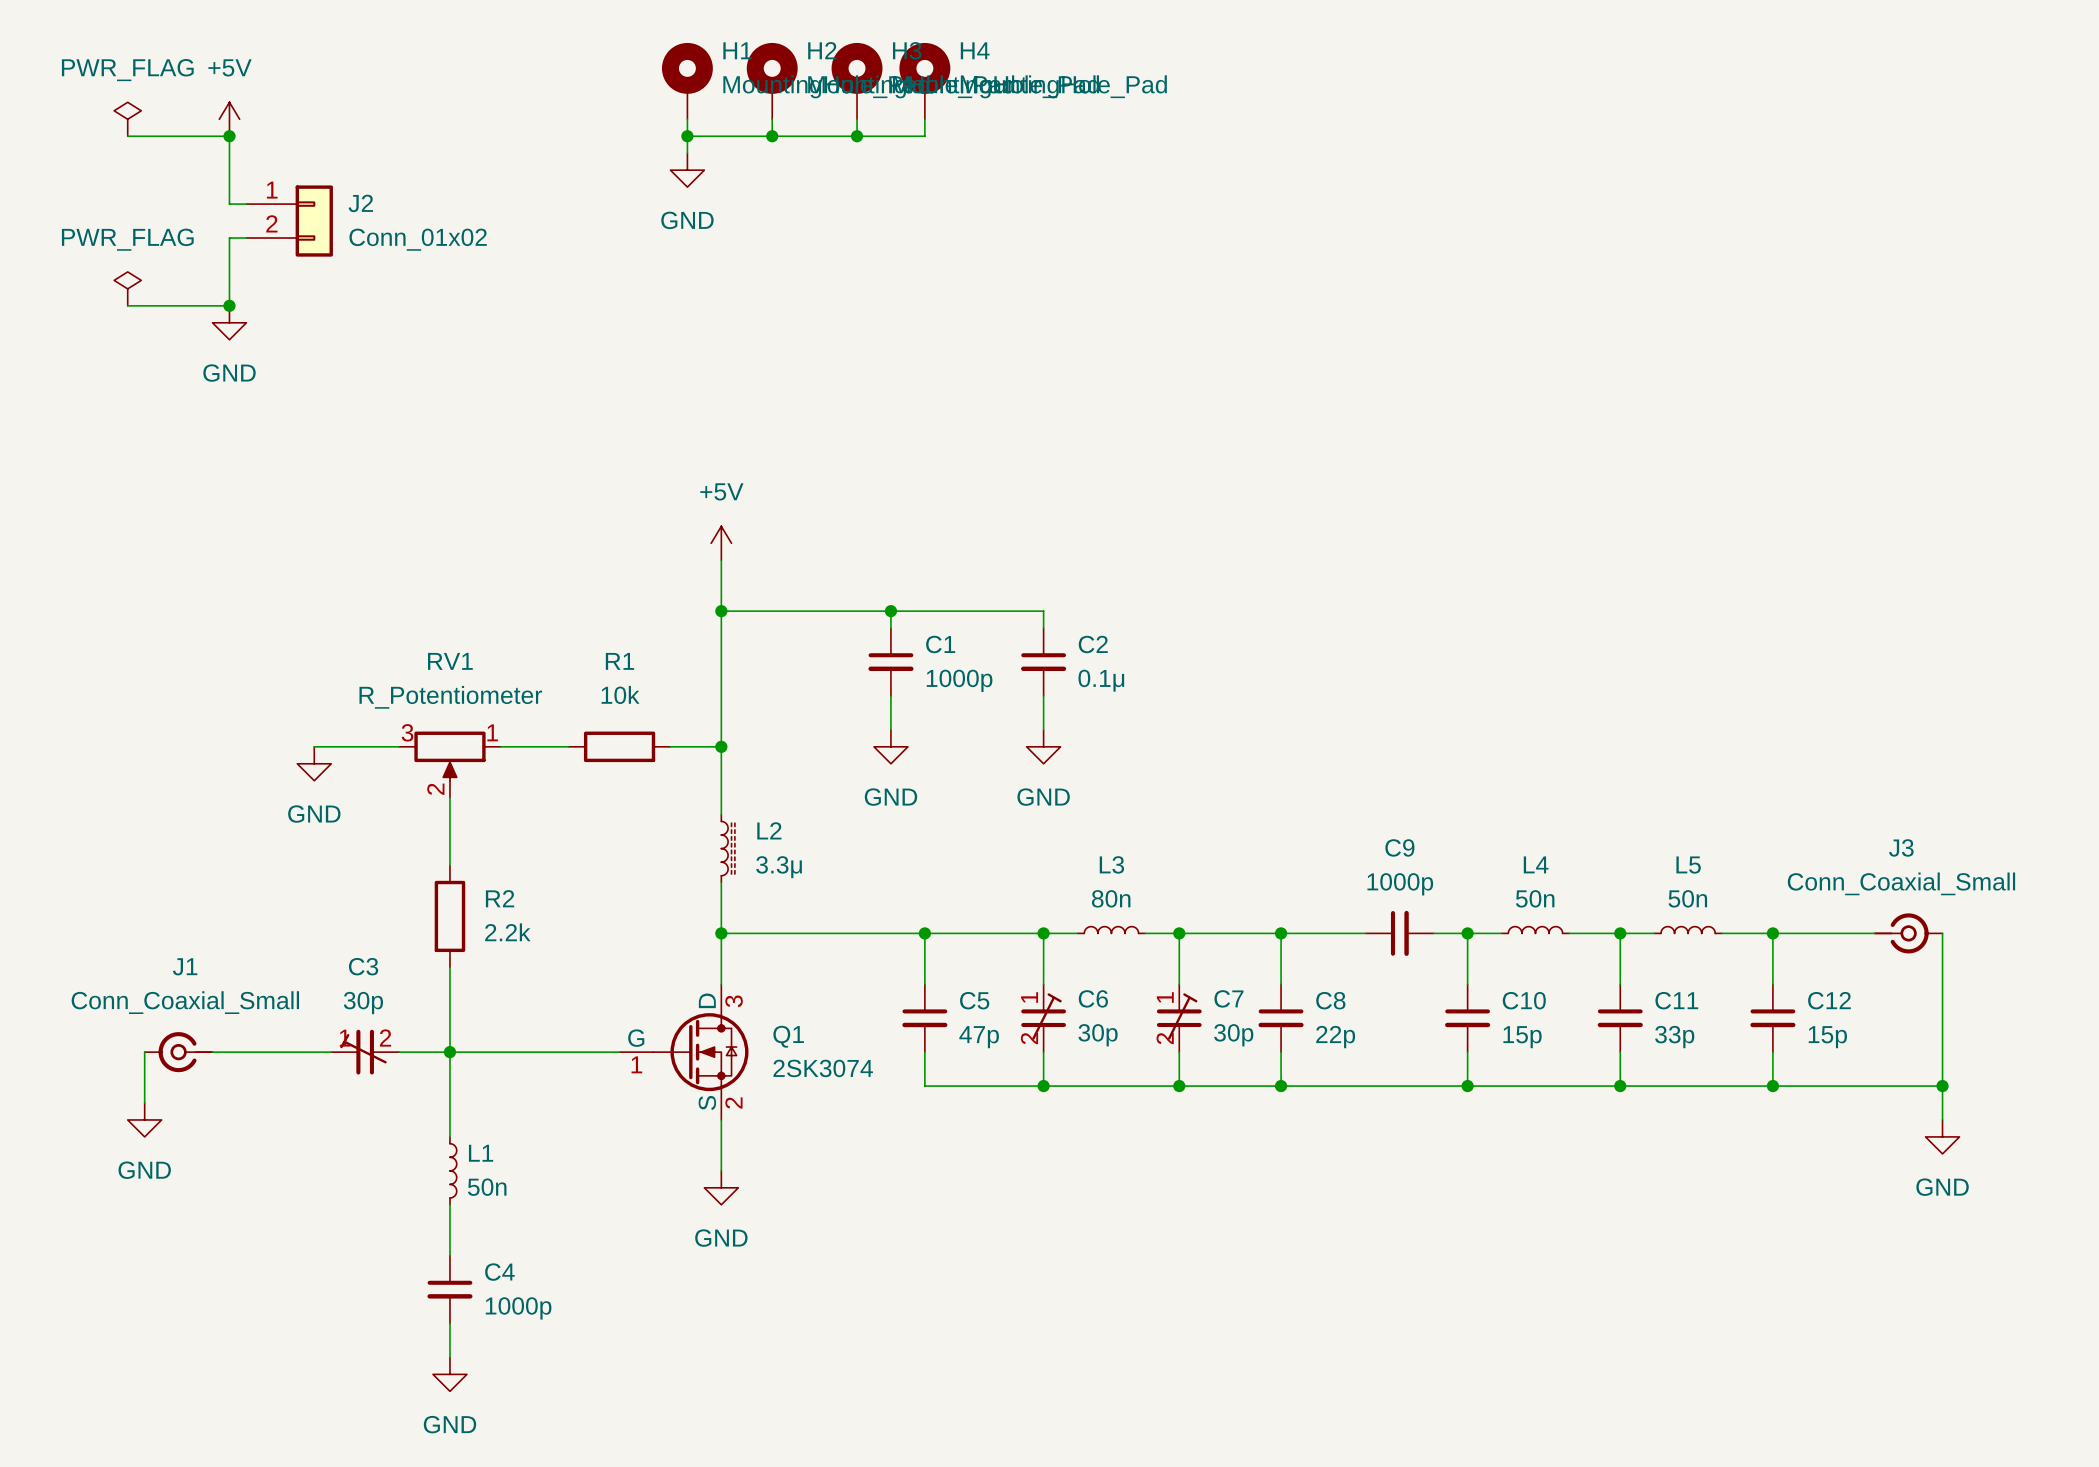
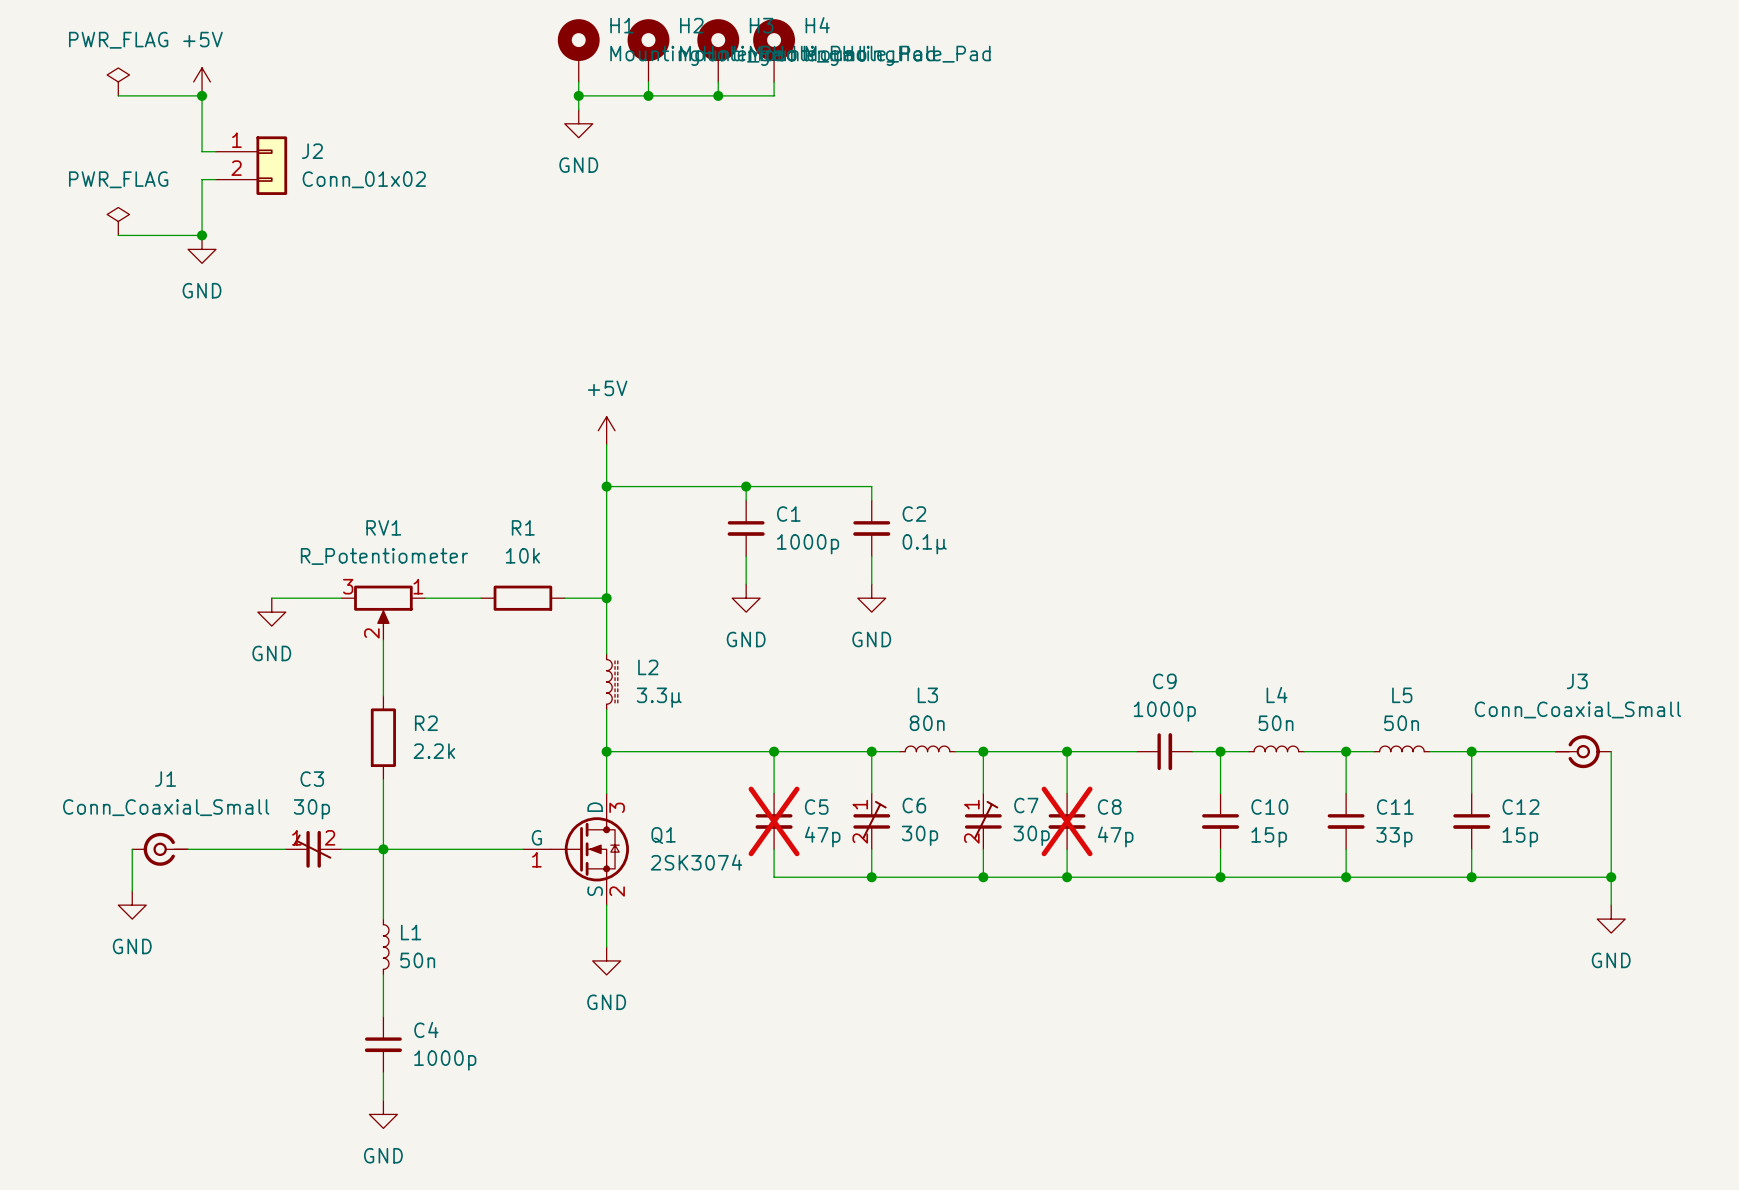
C5 do-not-place cross: none -> (774, 821)
C8 do-not-place cross: none -> (1067, 821)
C8 value: 22p (1335, 1037) -> 47p (1115, 836)

